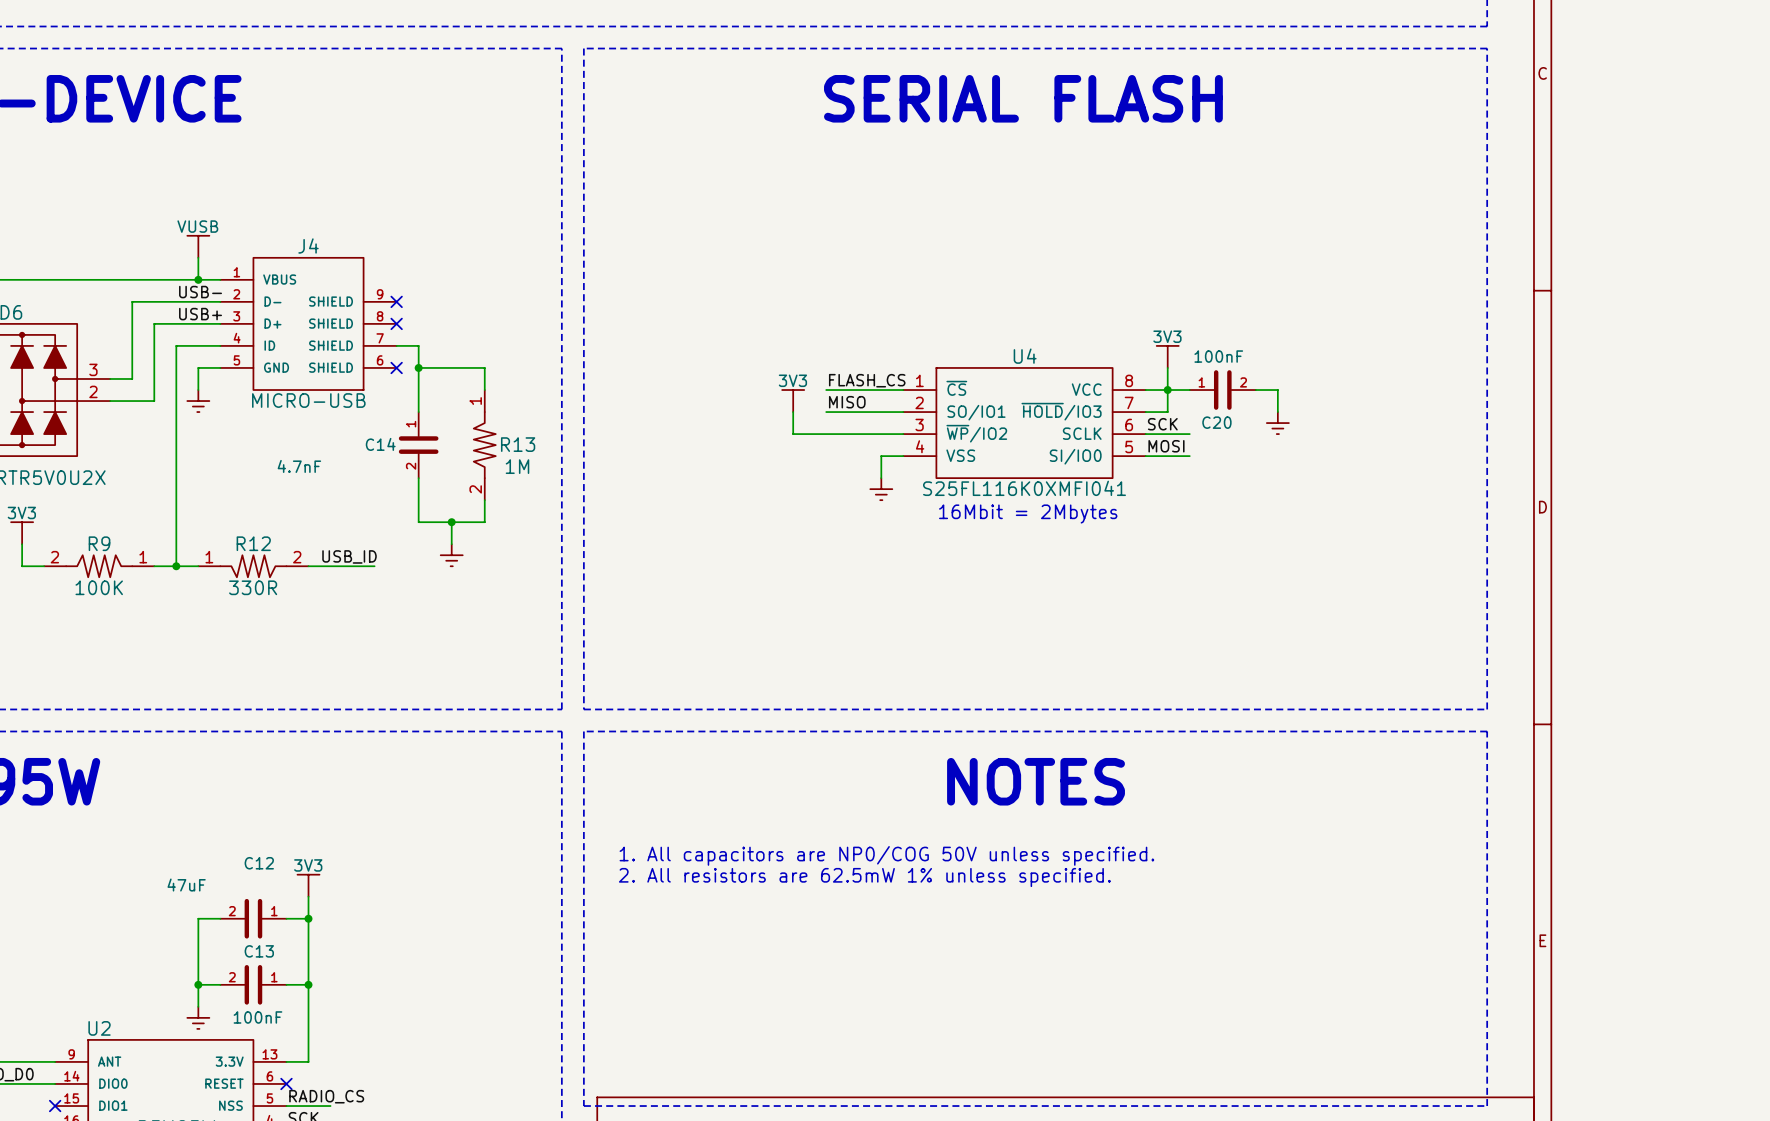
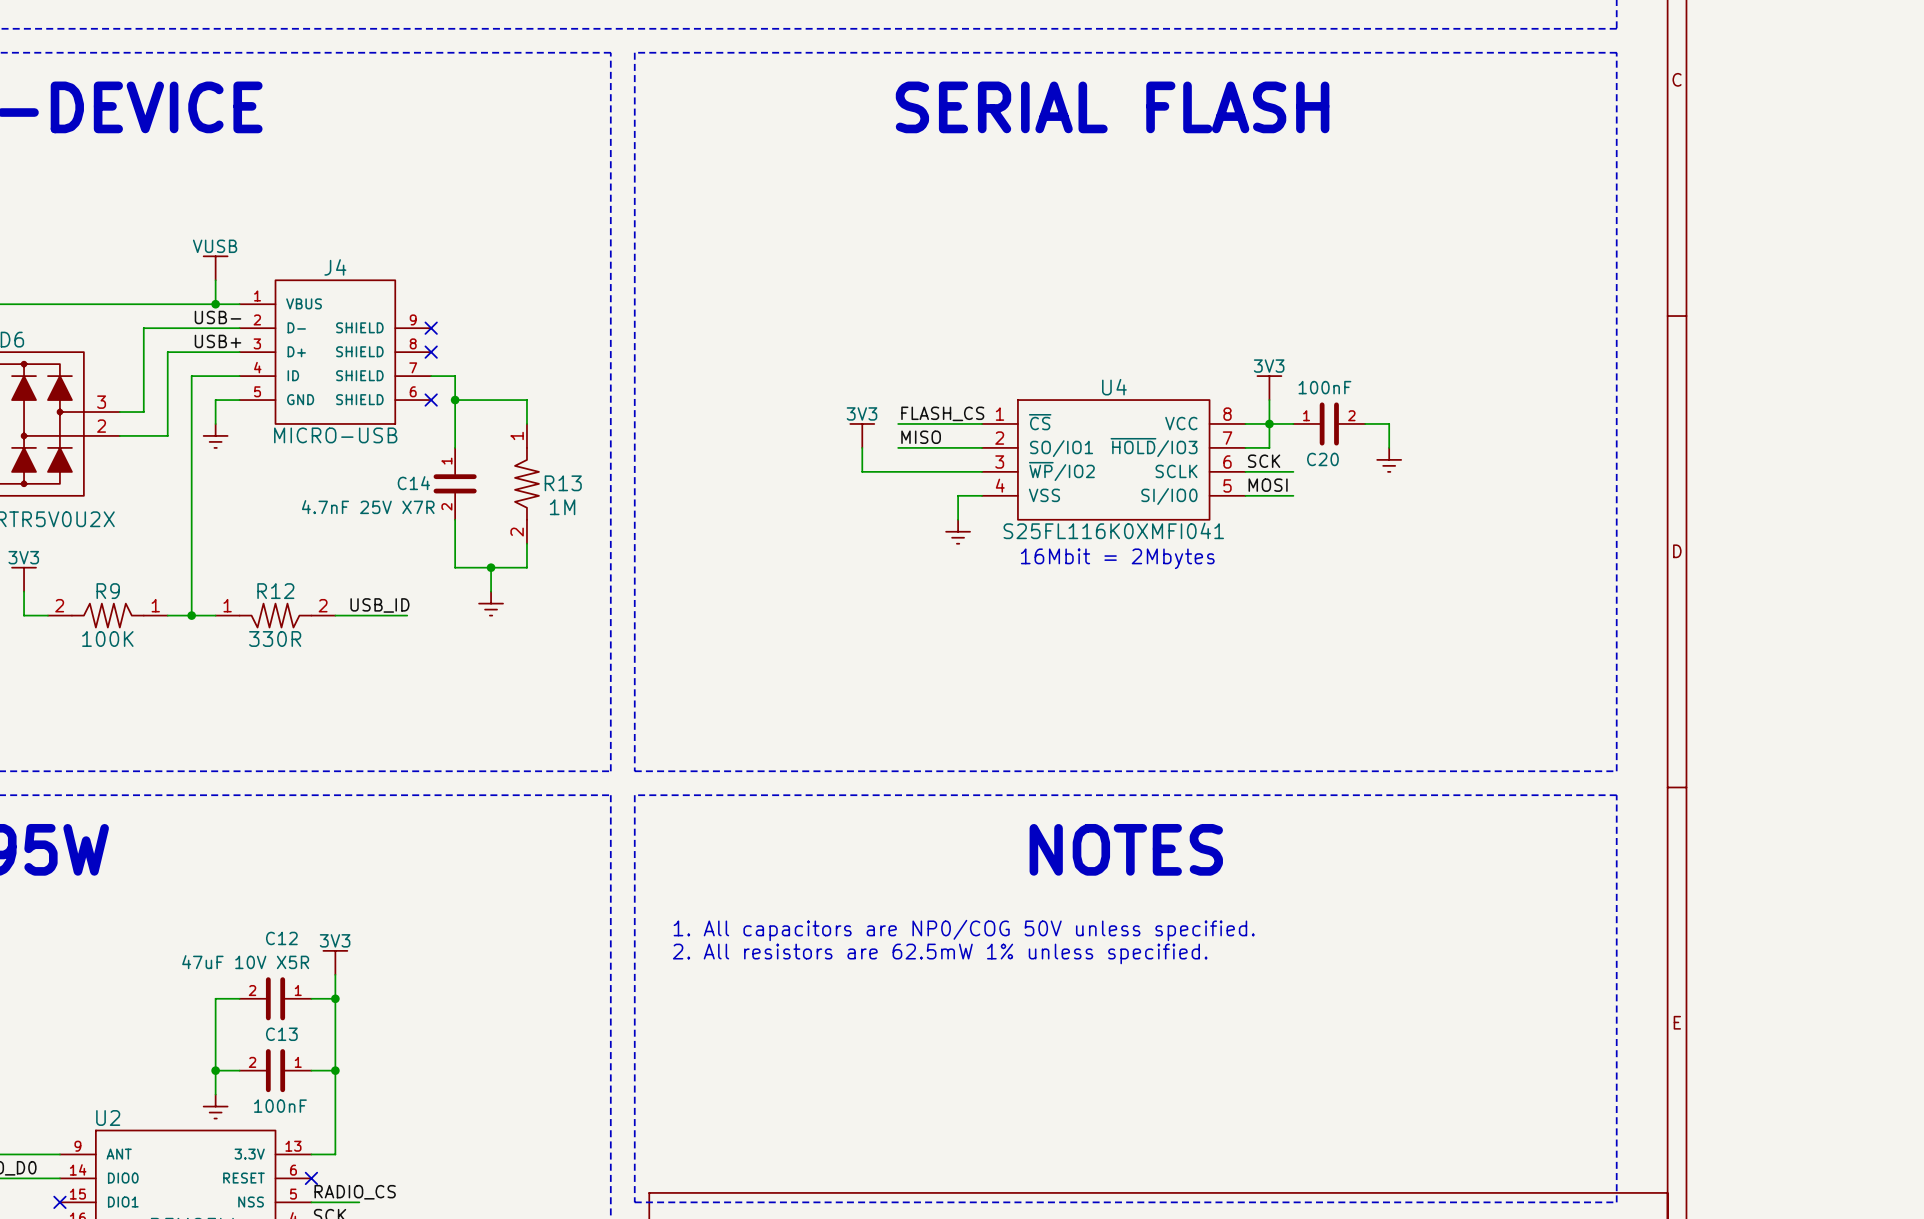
C14 value: 4.7nF (299, 466) -> 4.7nF 25V X7R (368, 507)
C12 value: 47uF (186, 885) -> 47uF 10V X5R (245, 962)

